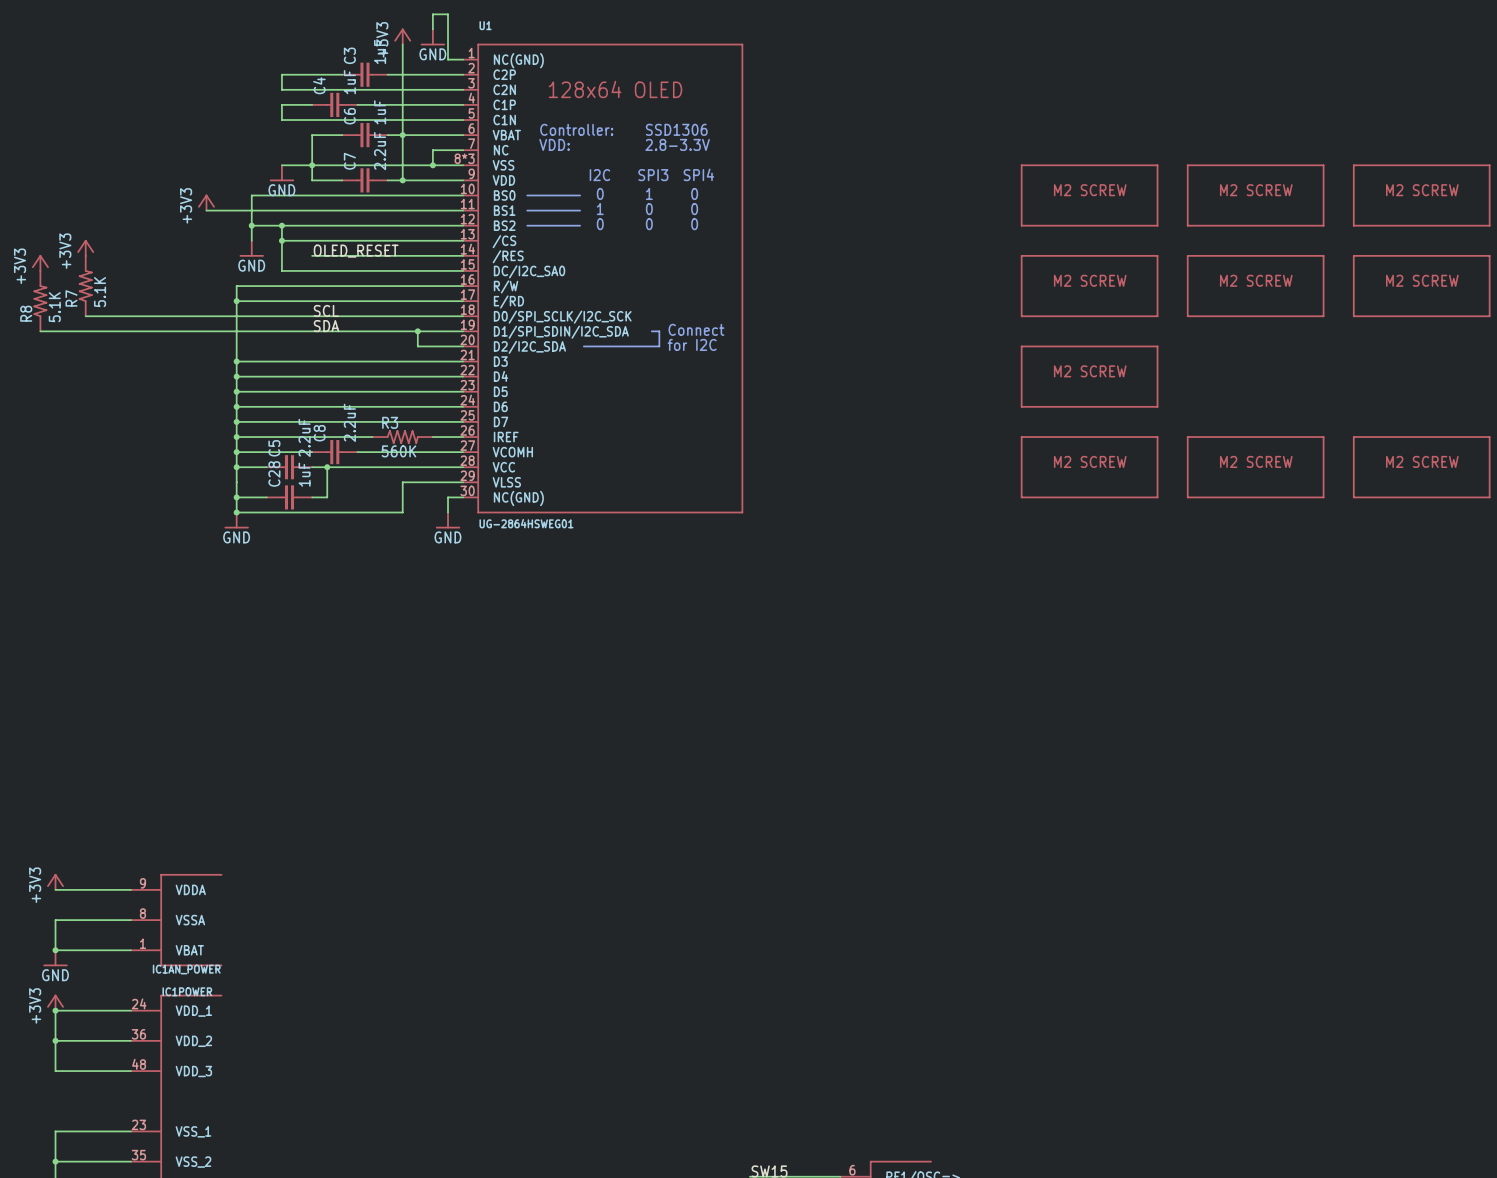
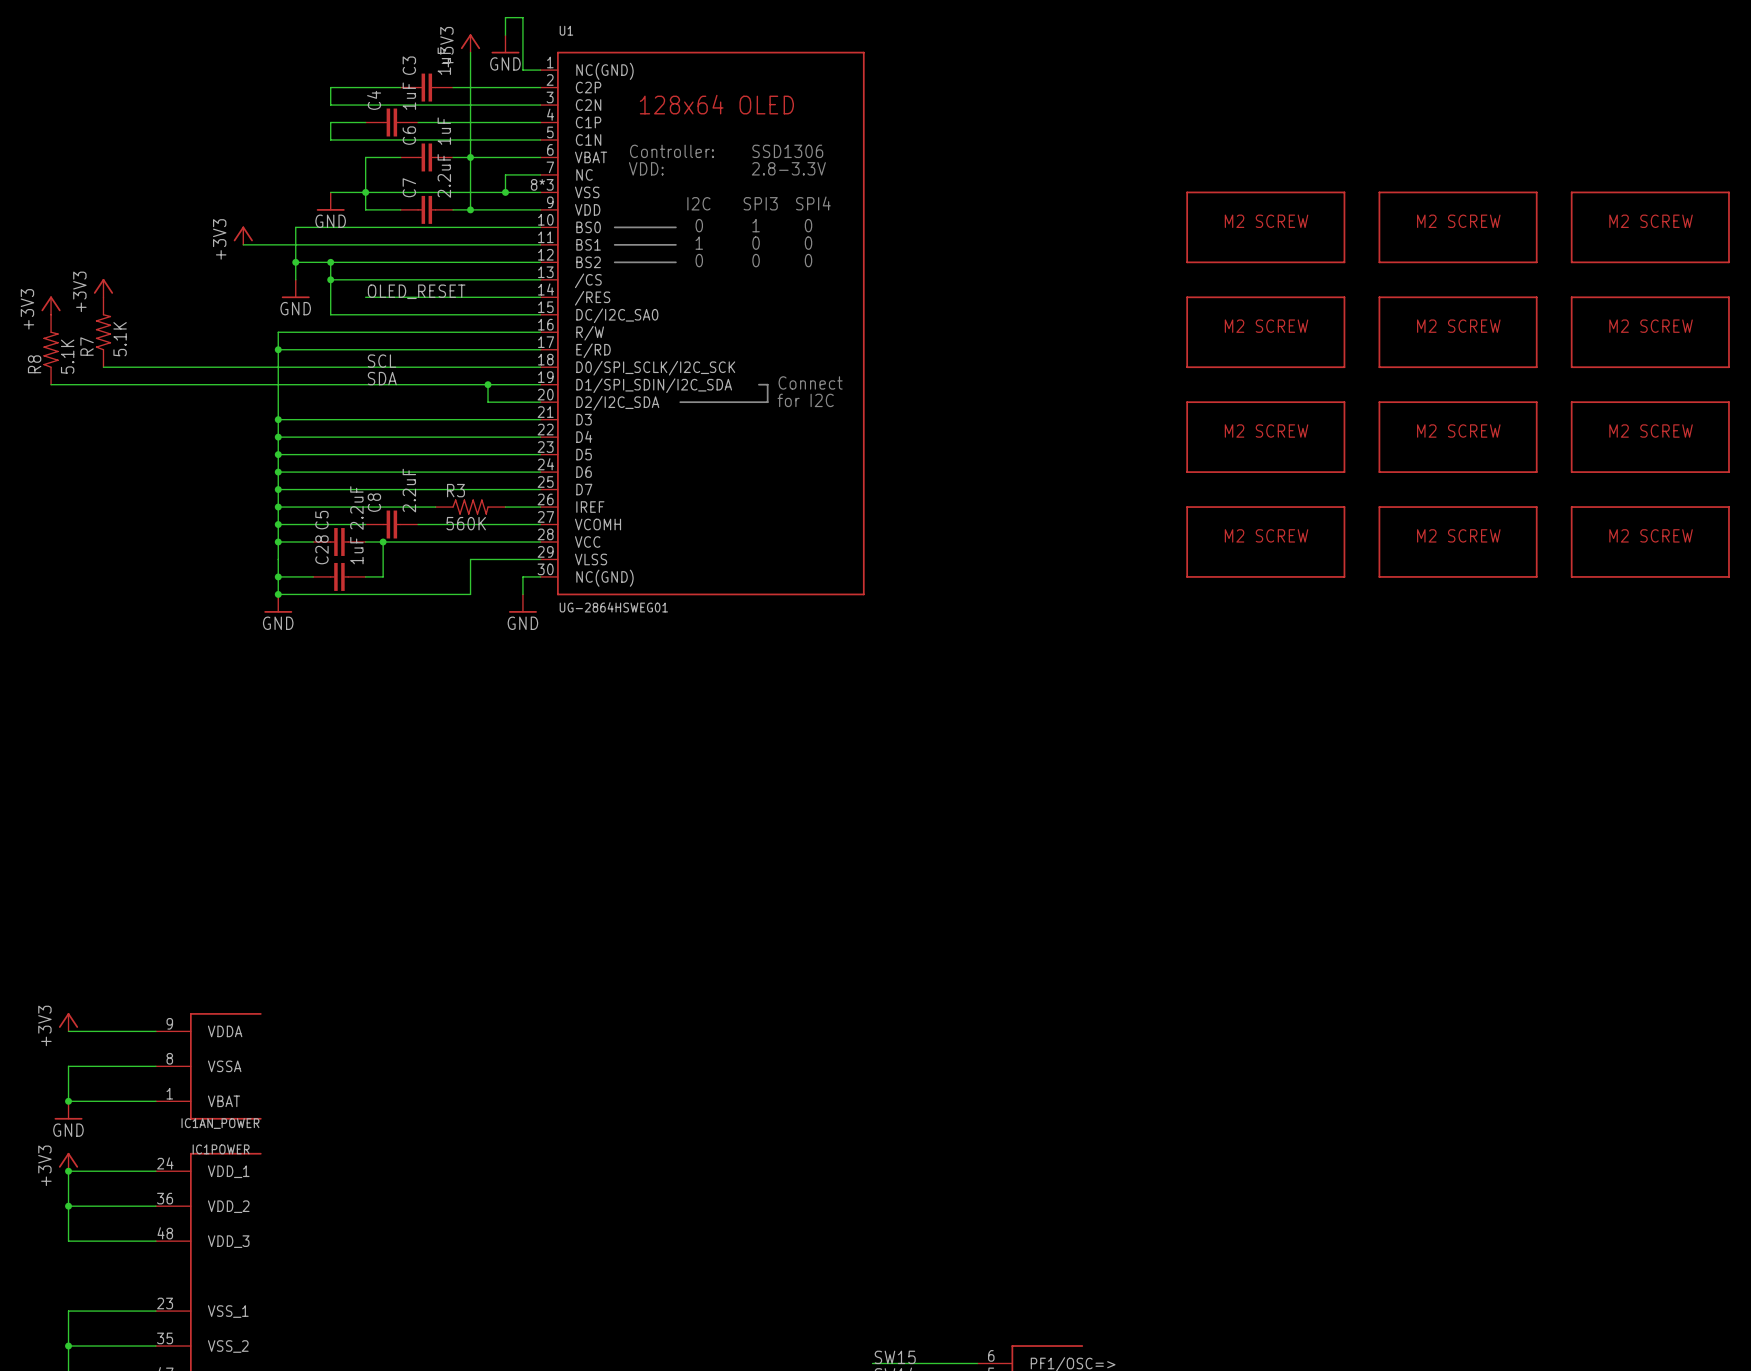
part: none -> (1458, 437)
part: none -> (1650, 437)

